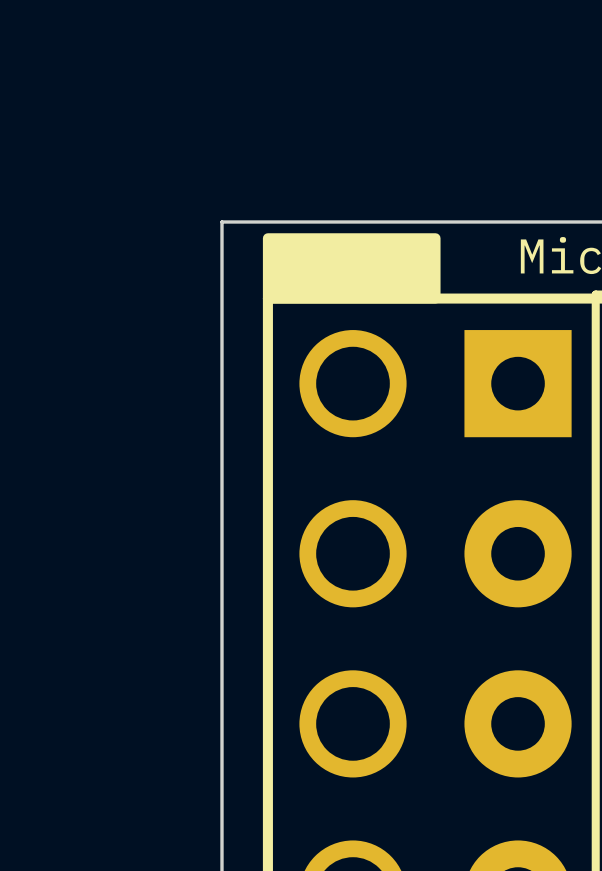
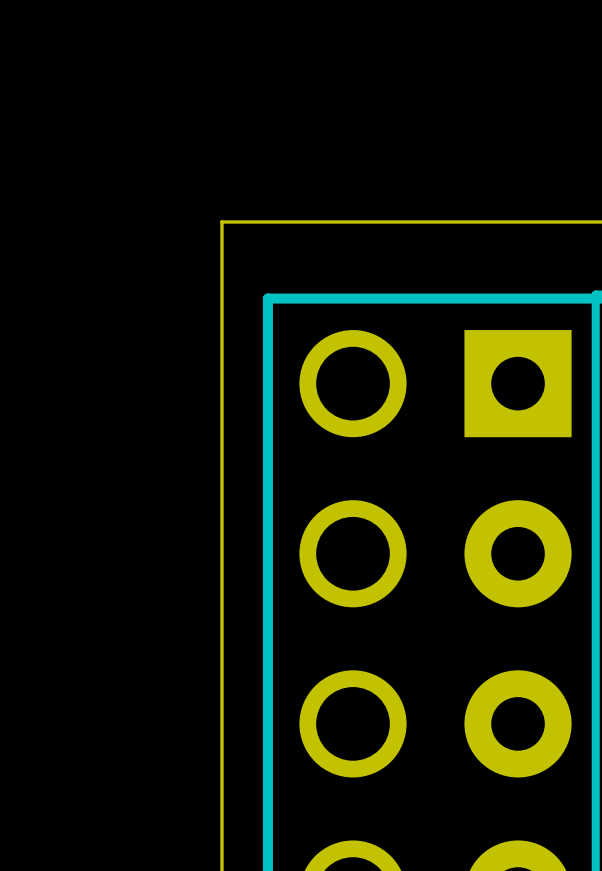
drawing: [262, 233, 441, 304] -> none

